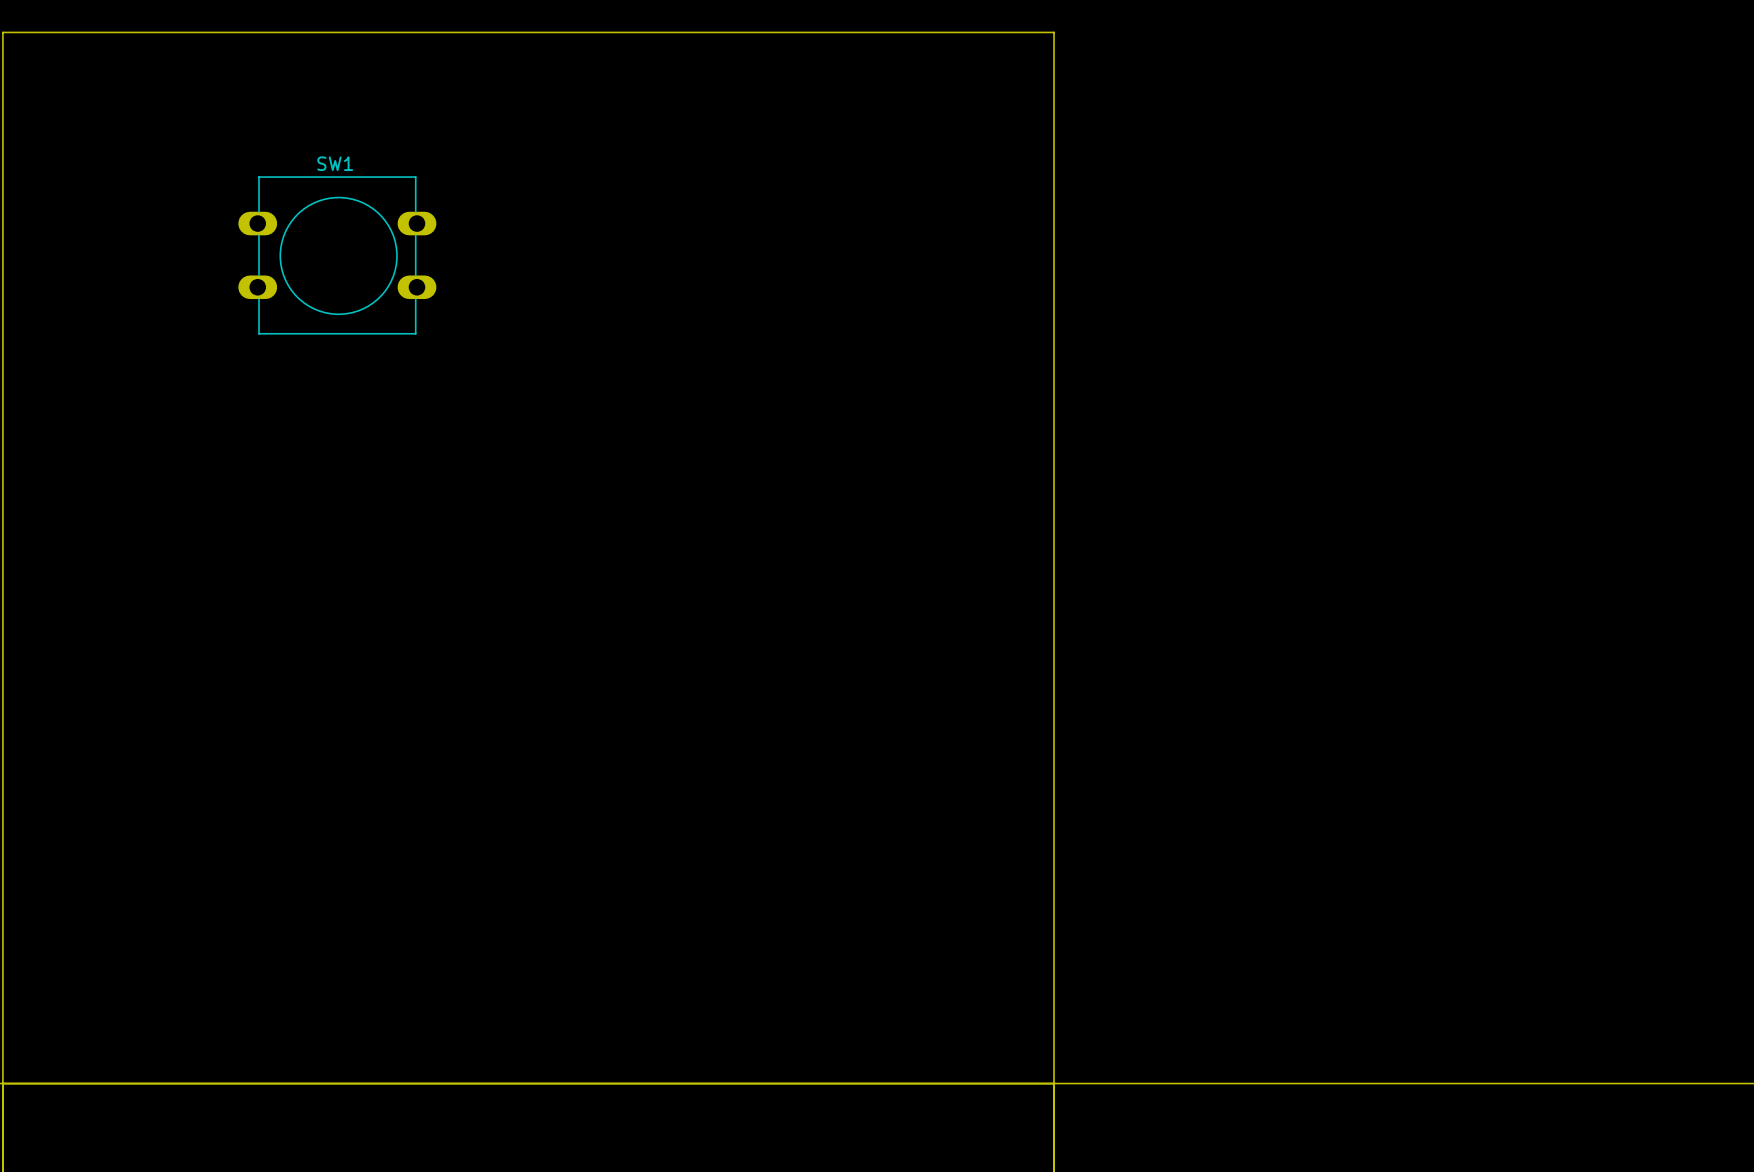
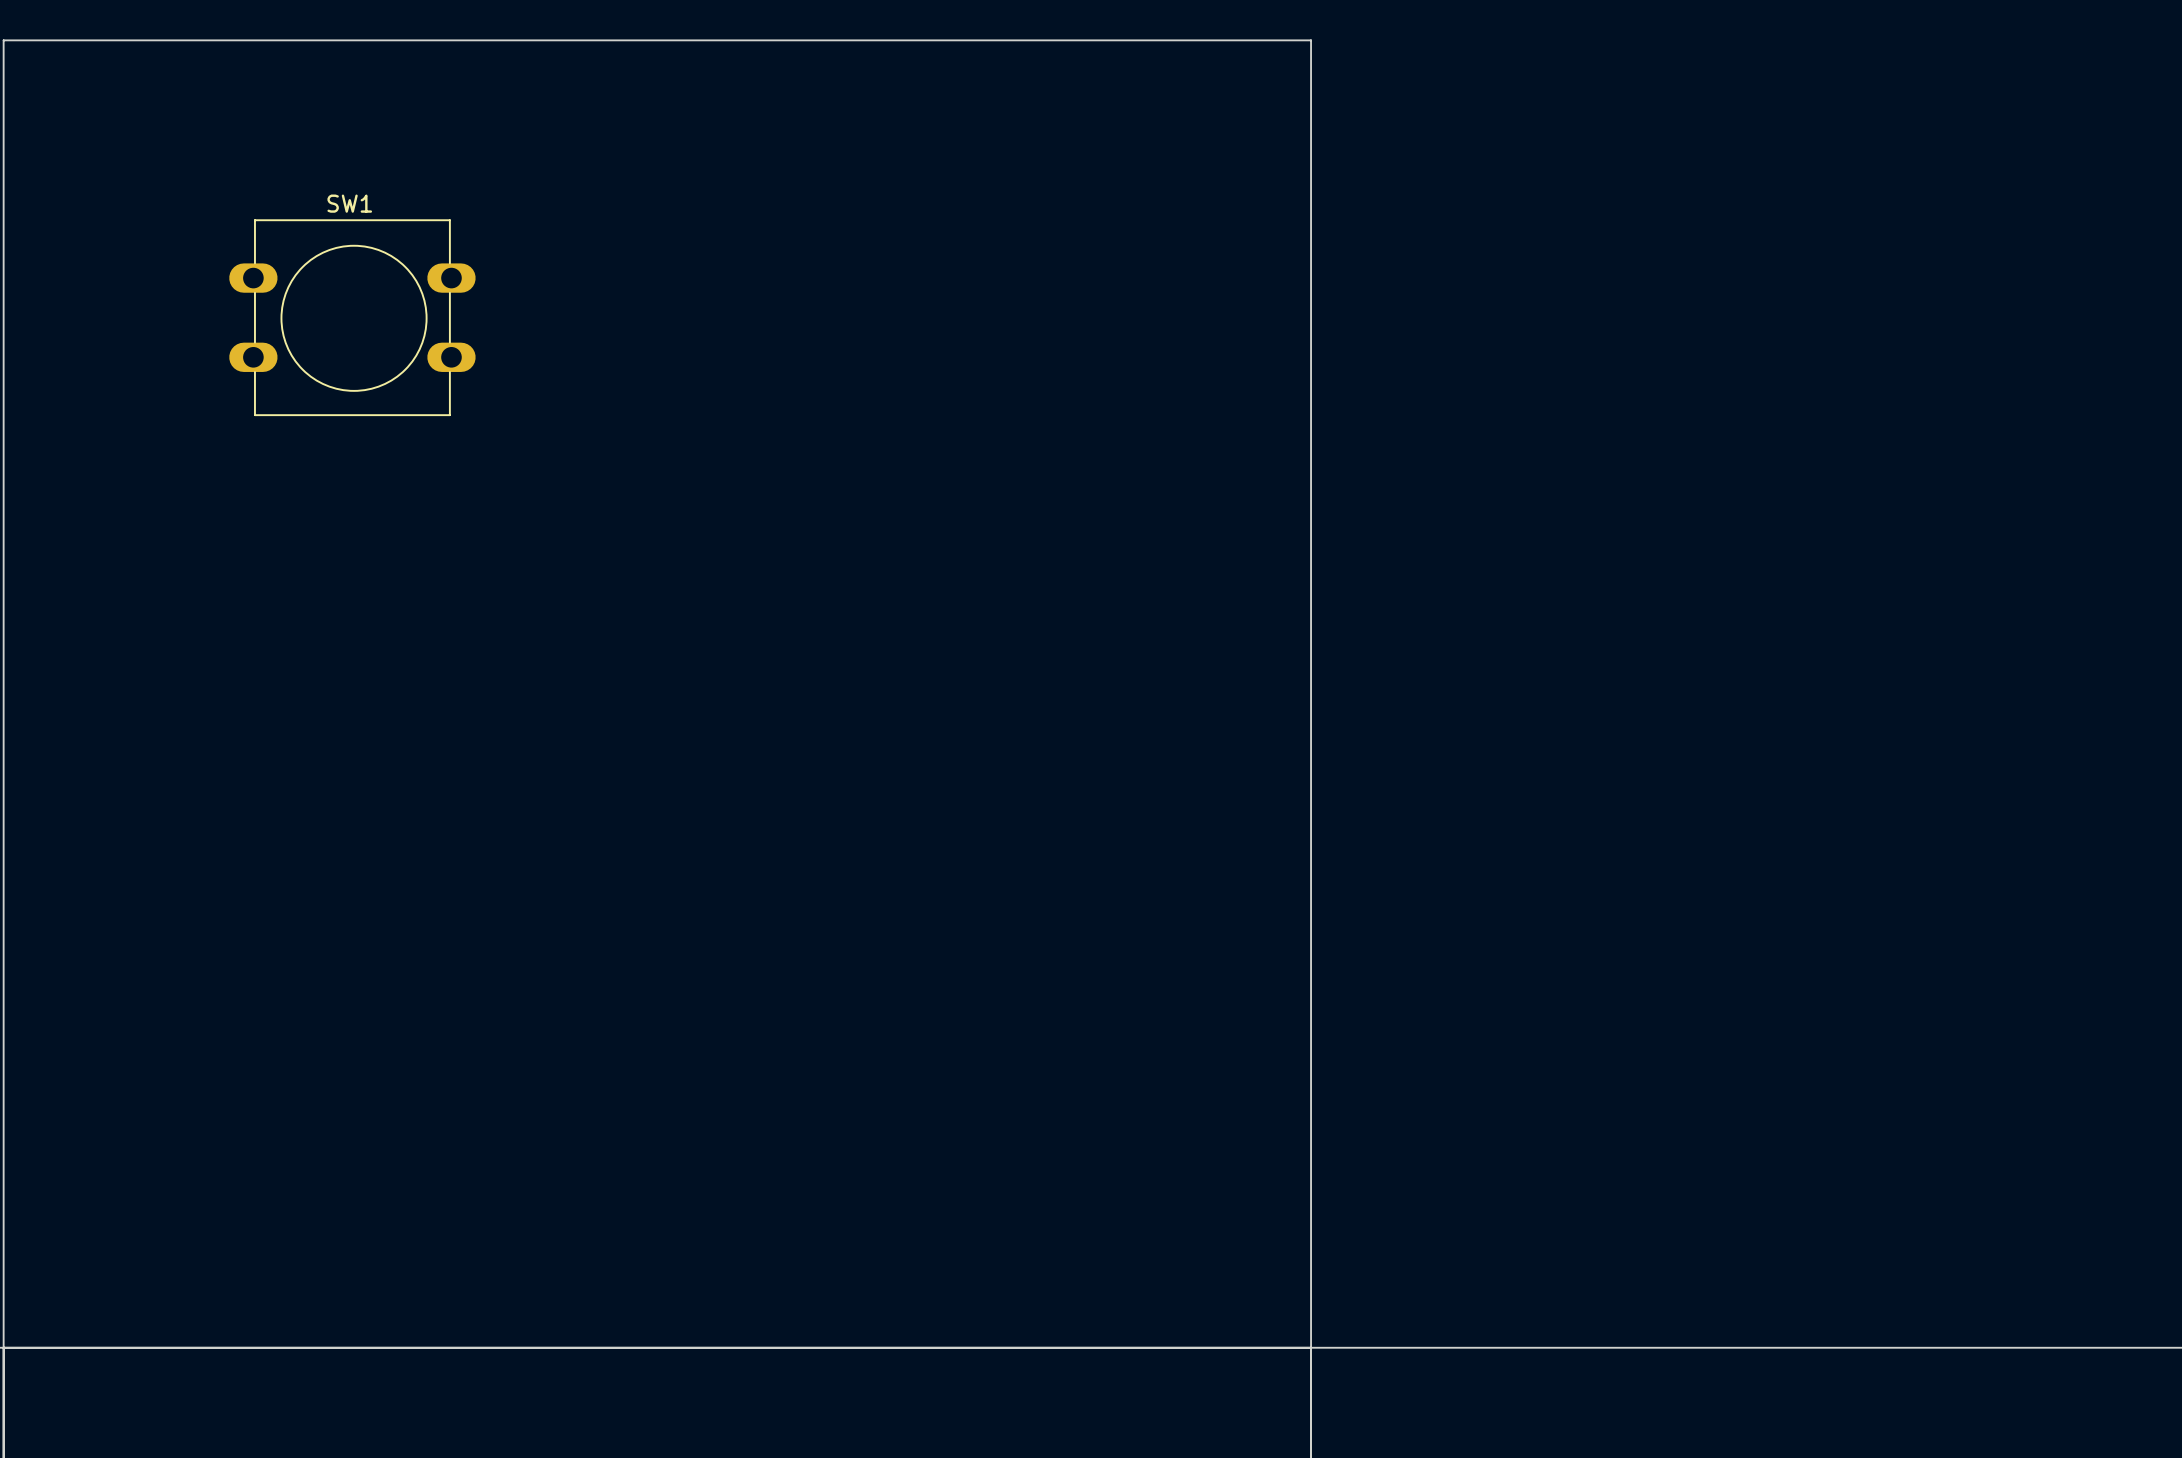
SW1 position: (337, 255) -> (352, 317)

